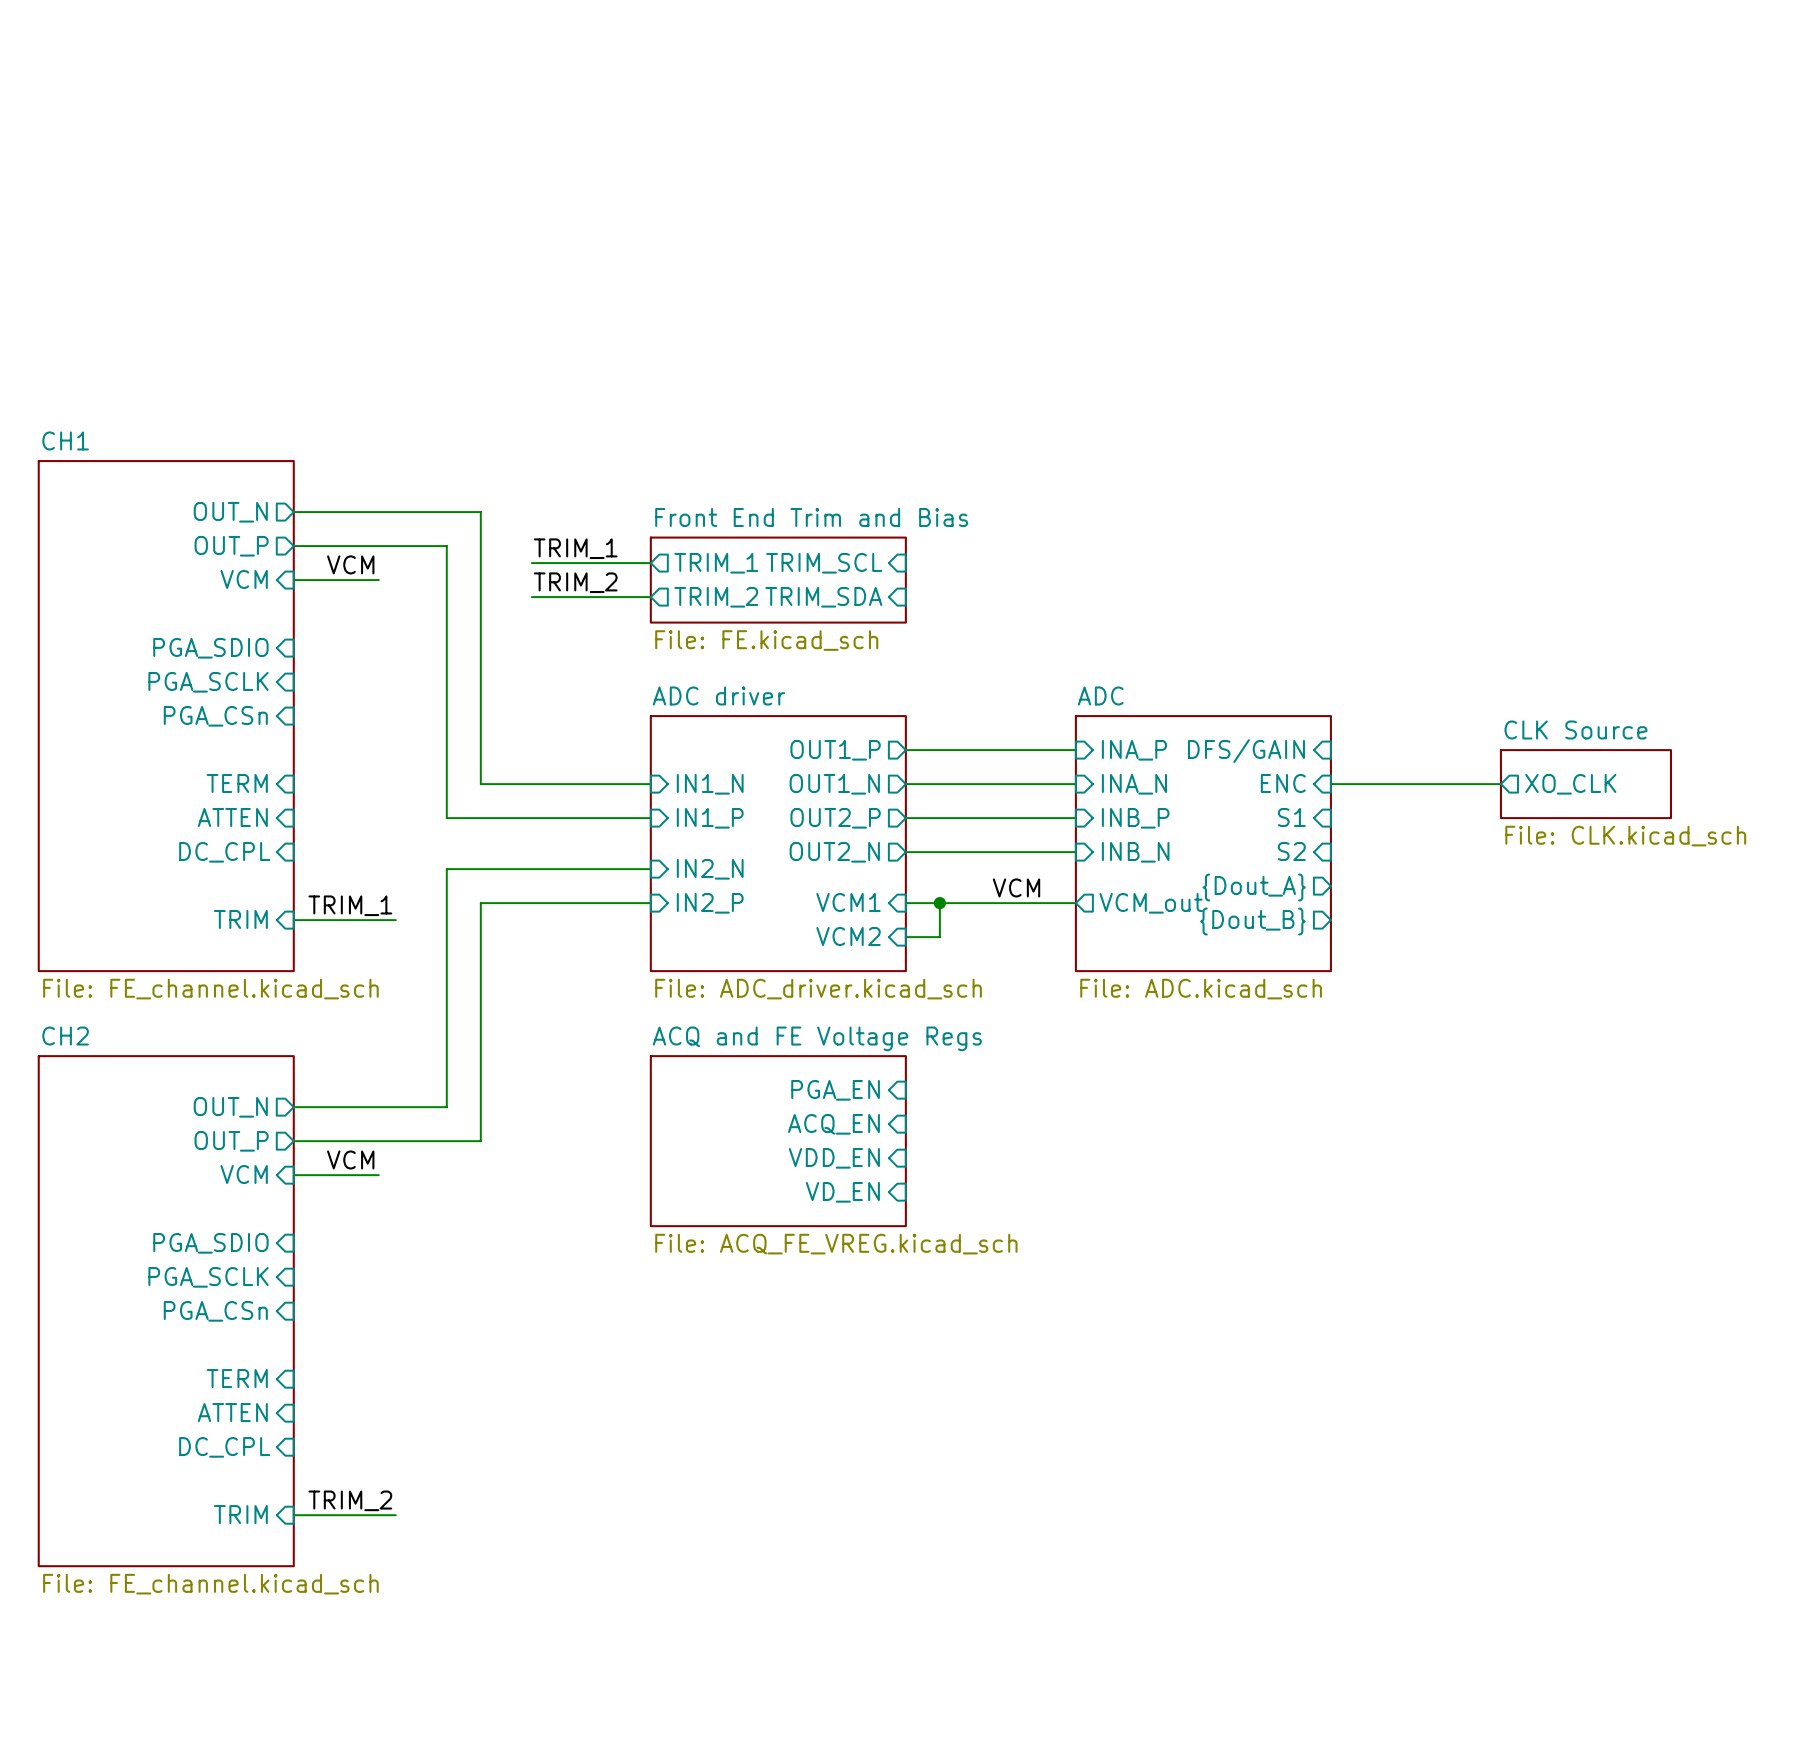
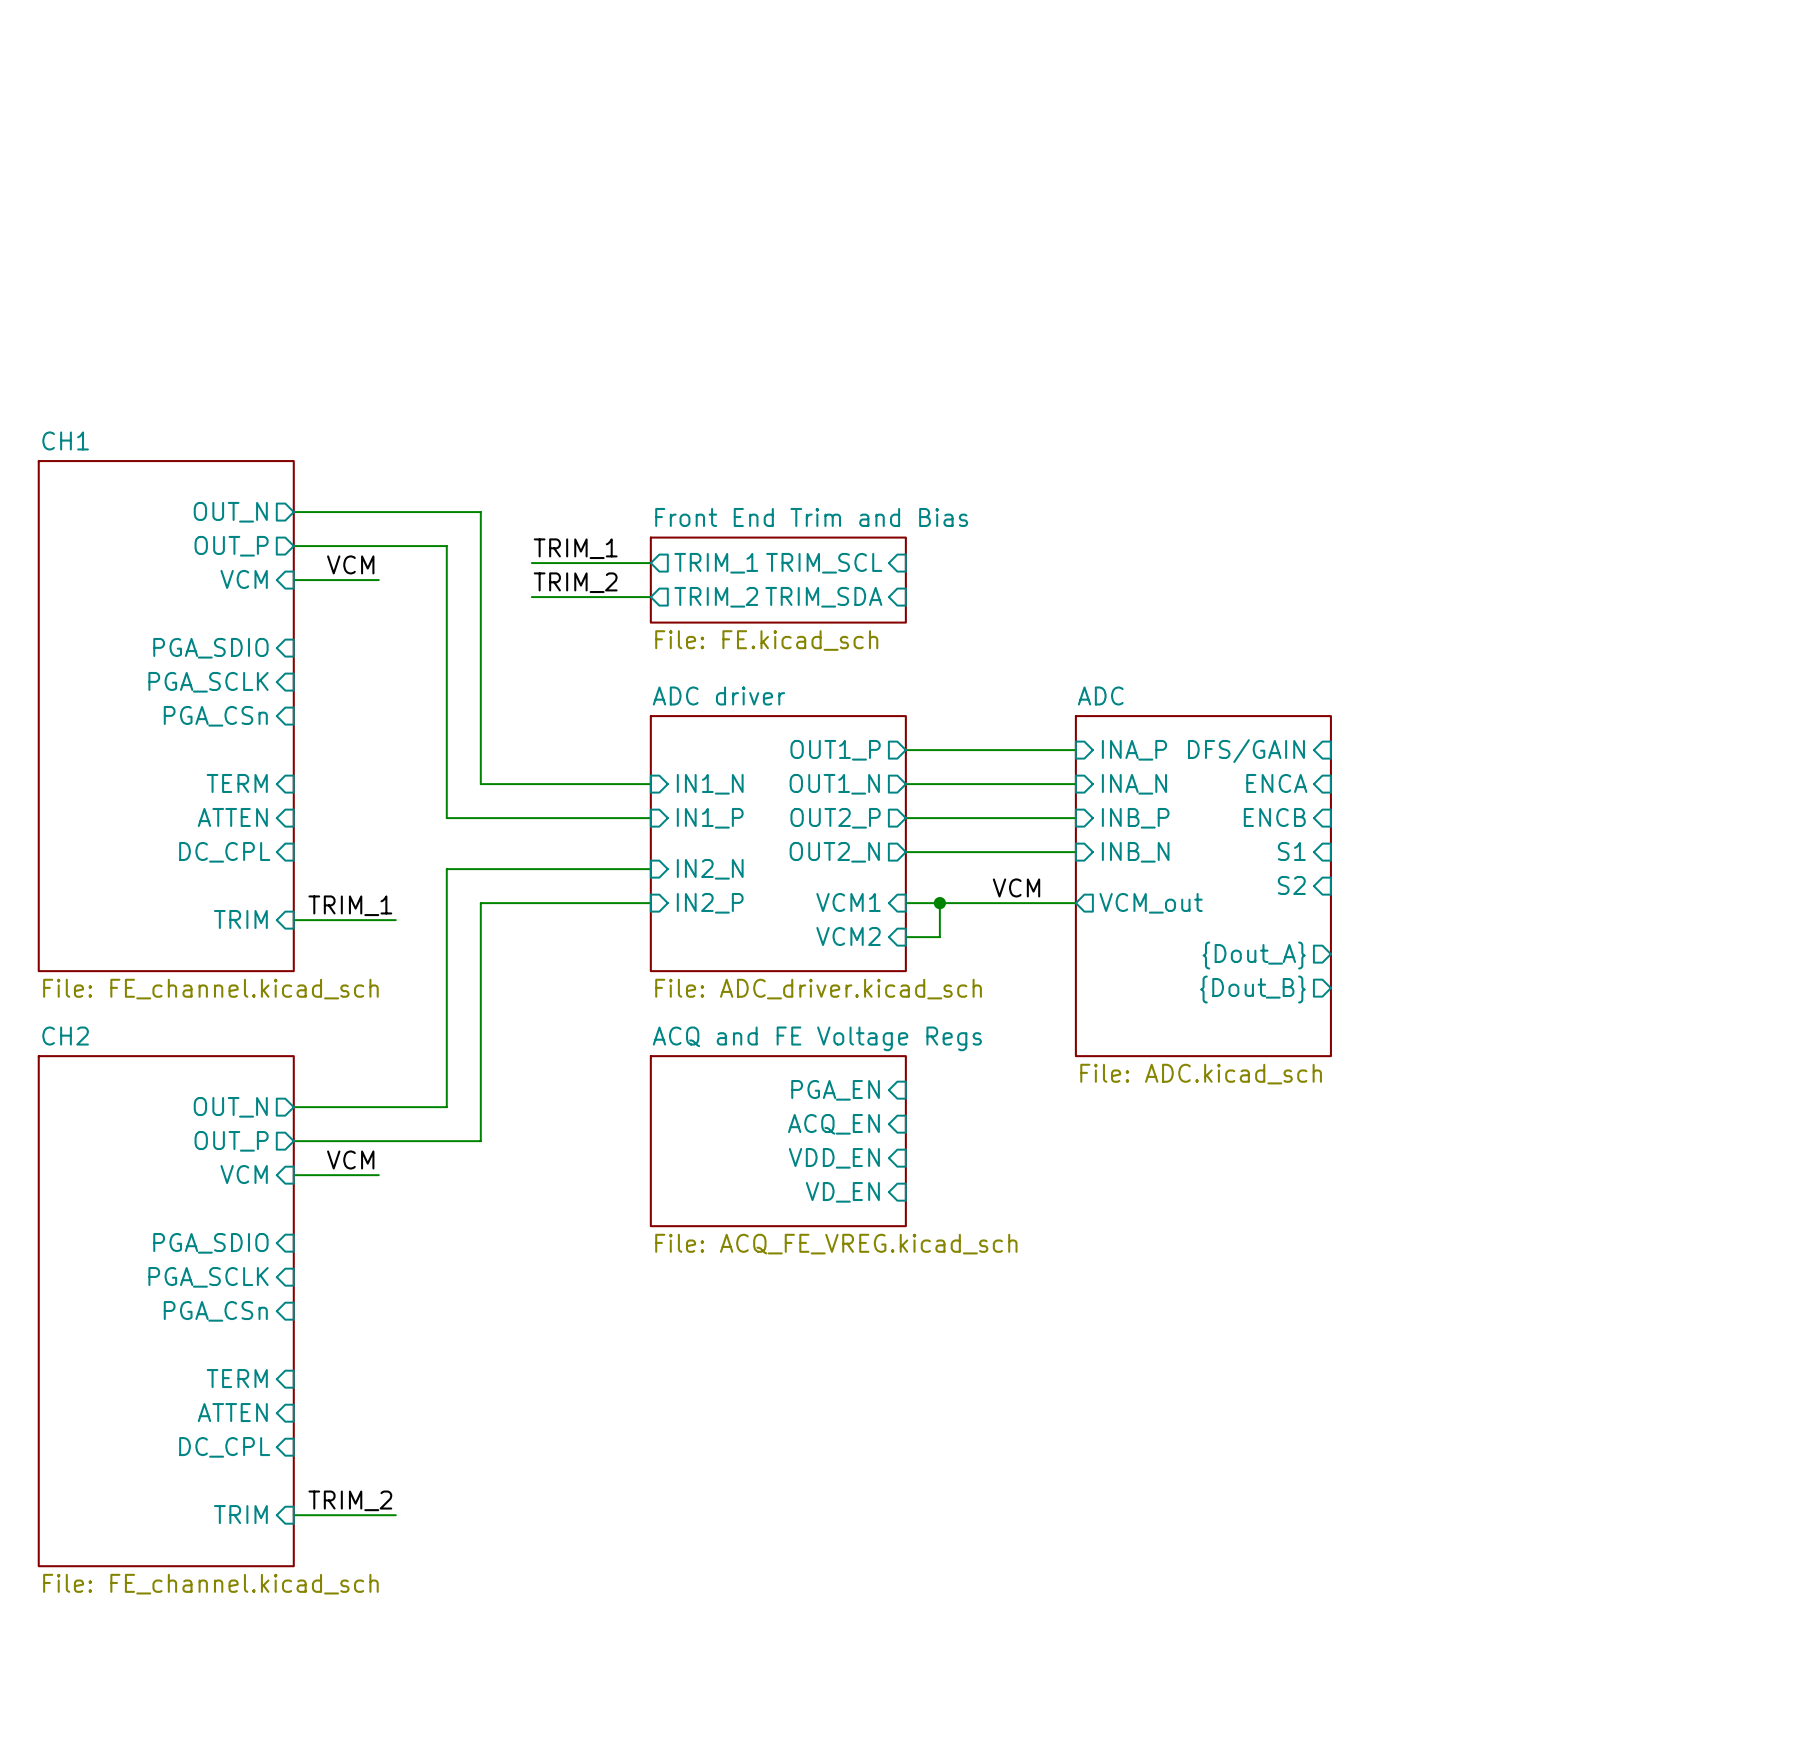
sheet pin: ENC (1283, 783) -> ENCA (1276, 783)
wire: (1330, 784) (1500, 784) -> none
sheet pin: XO_CLK (1570, 784) -> none
sheet CLK Source: File: CLK.kicad_sch (1585, 784) -> none
sheet pin: S1 (1291, 817) -> ENCB (1274, 817)
sheet ADC: File: ADC.kicad_sch (1203, 843) -> none
sheet pin: S2 (1291, 851) -> S1 (1291, 851)
sheet ADC: none -> File: ADC.kicad_sch (1203, 886)
sheet pin shape: output (1254, 887) -> input (1291, 885)
sheet pin: {Dout_A} (1254, 887) -> S2 (1291, 885)
sheet pin position: {Dout_B} (1252, 921) -> {Dout_B} (1252, 989)
sheet pin: none -> {Dout_A} (1254, 955)

